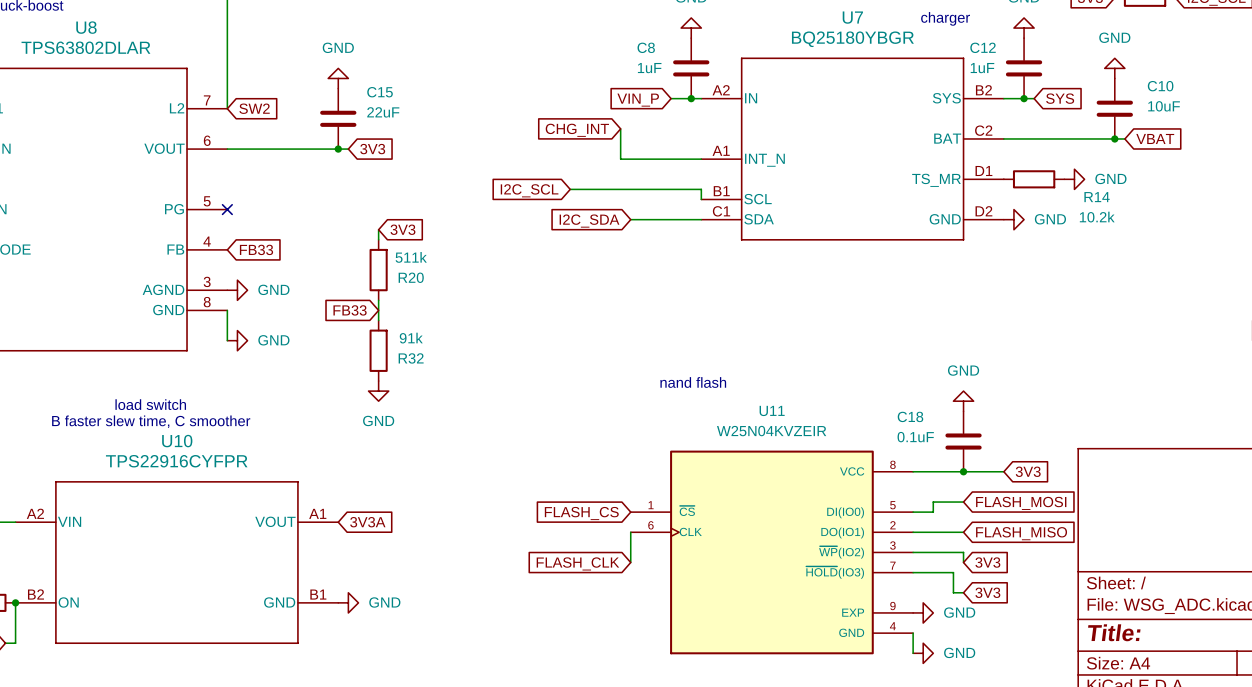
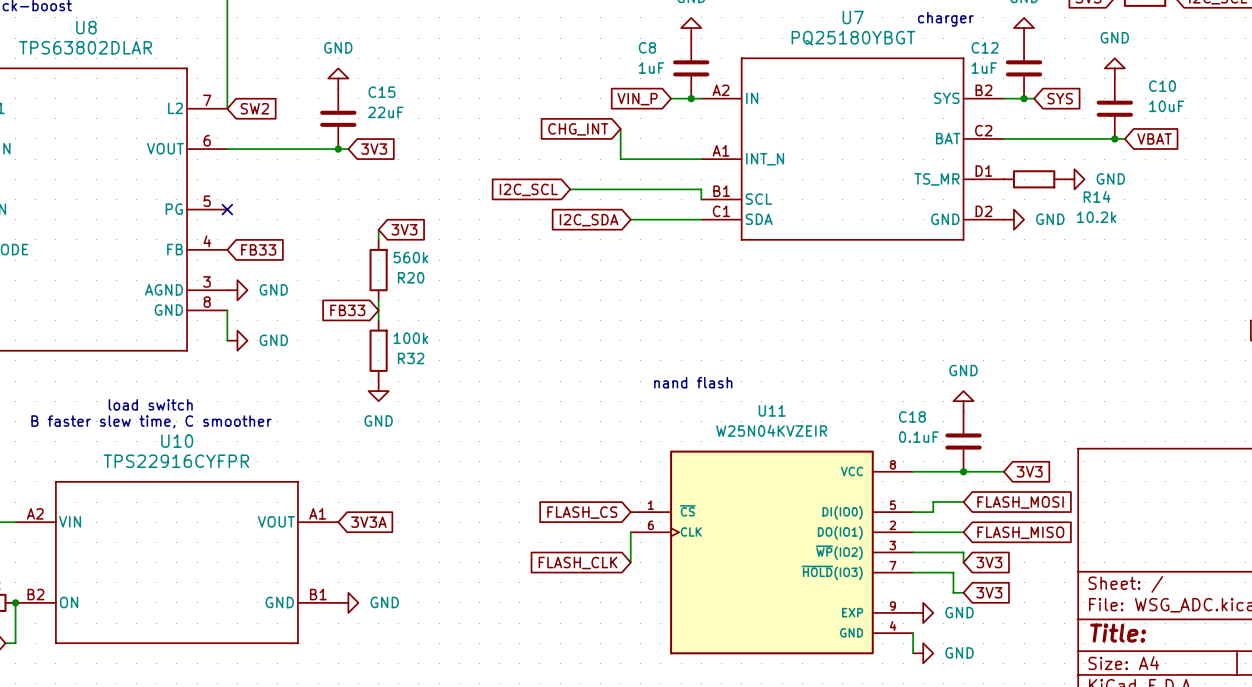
U7 value: BQ25180YBGR (852, 39) -> PQ25180YBGT (853, 38)
R20 value: 511k (411, 257) -> 560k (410, 257)
R32 value: 91k (411, 338) -> 100k (410, 338)

